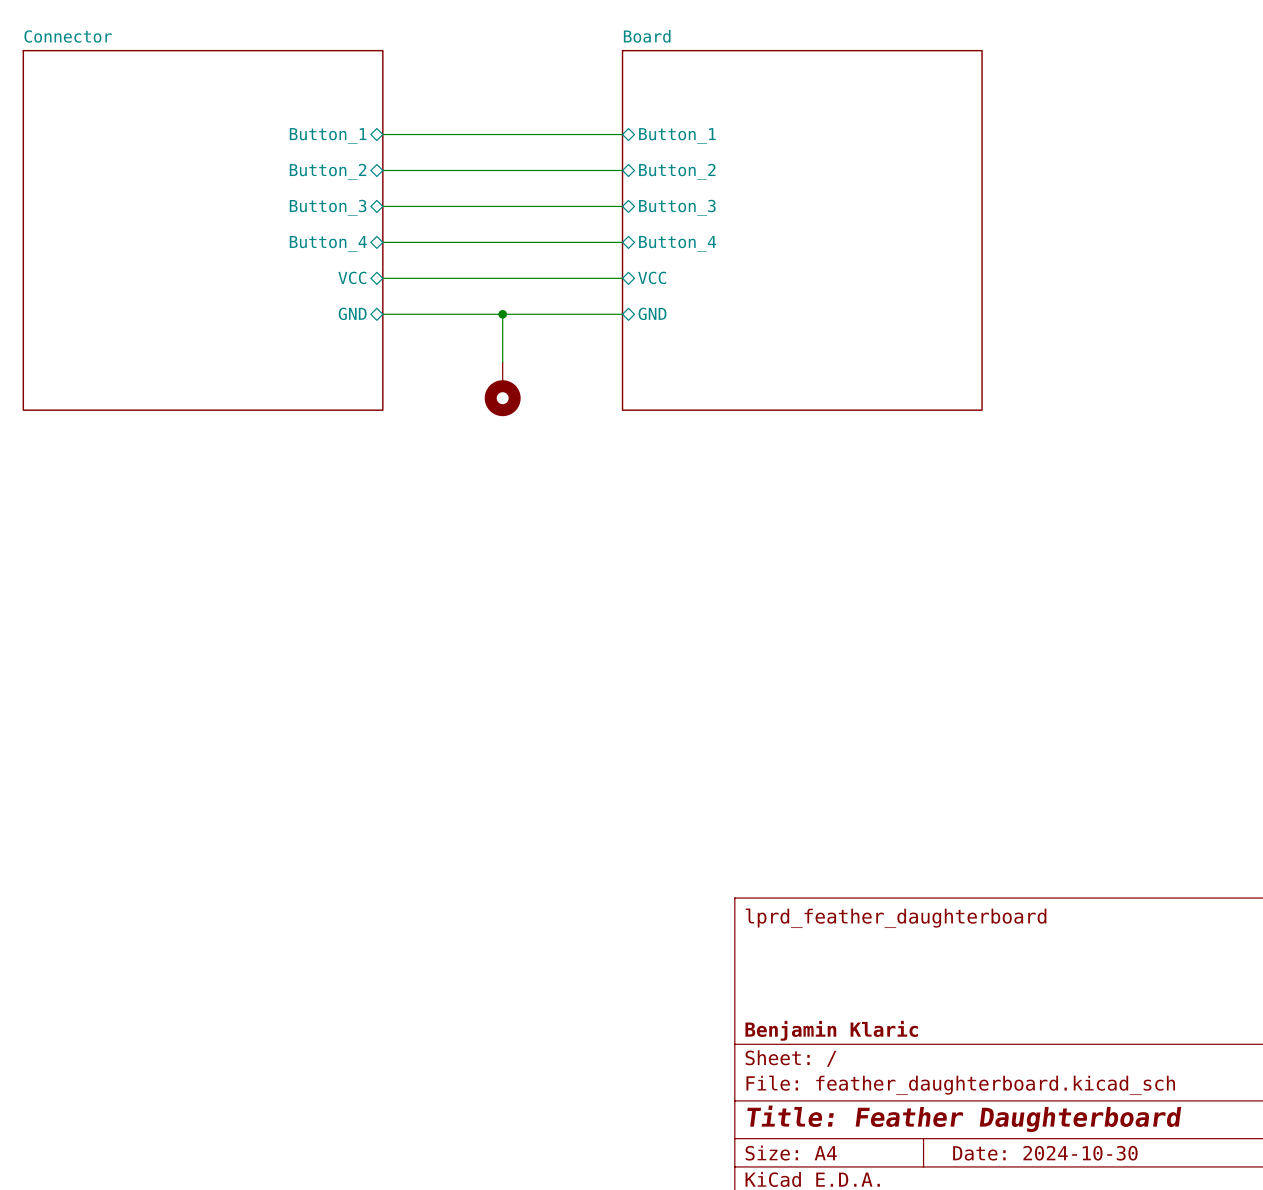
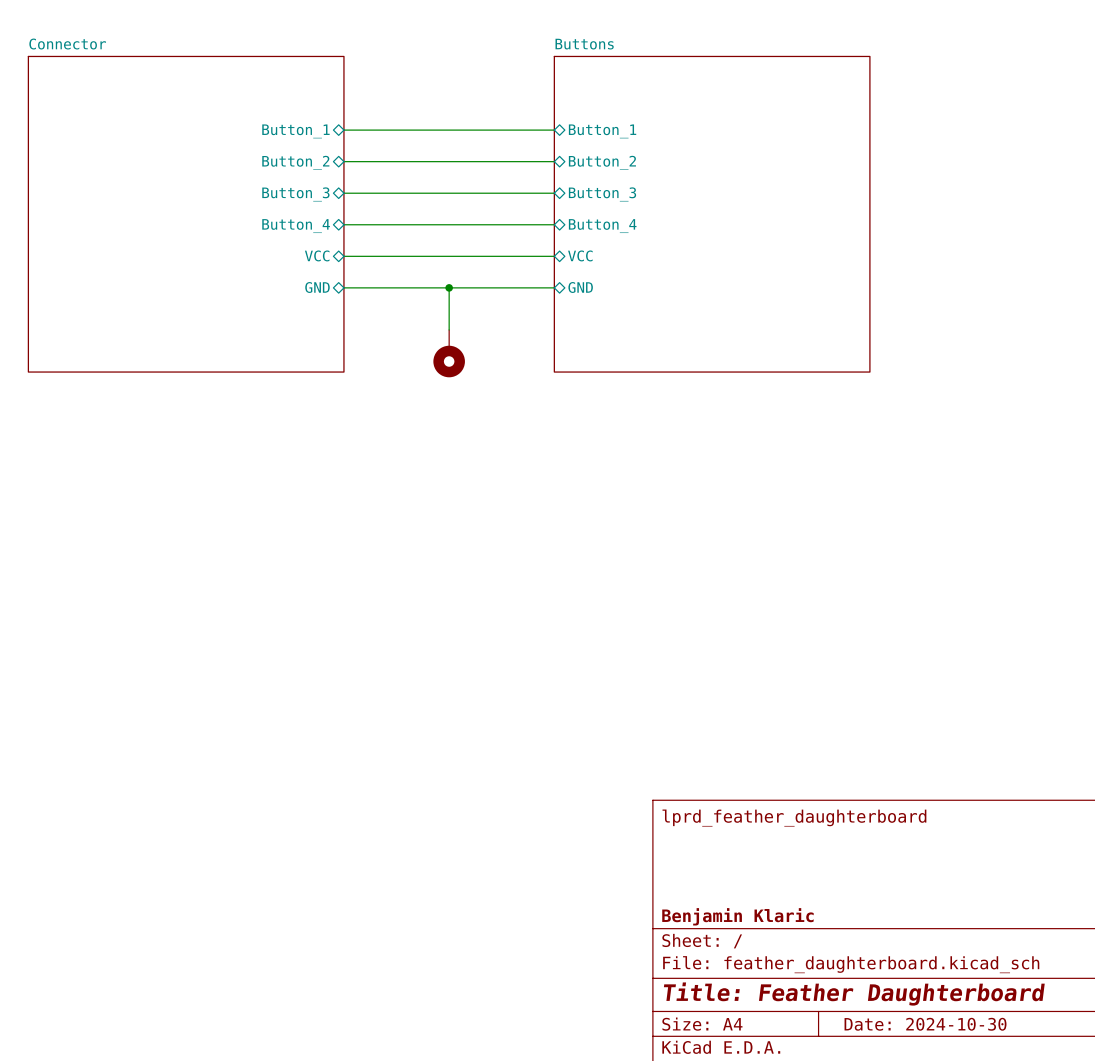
sheet Board name: Board (647, 36) -> Buttons (584, 44)

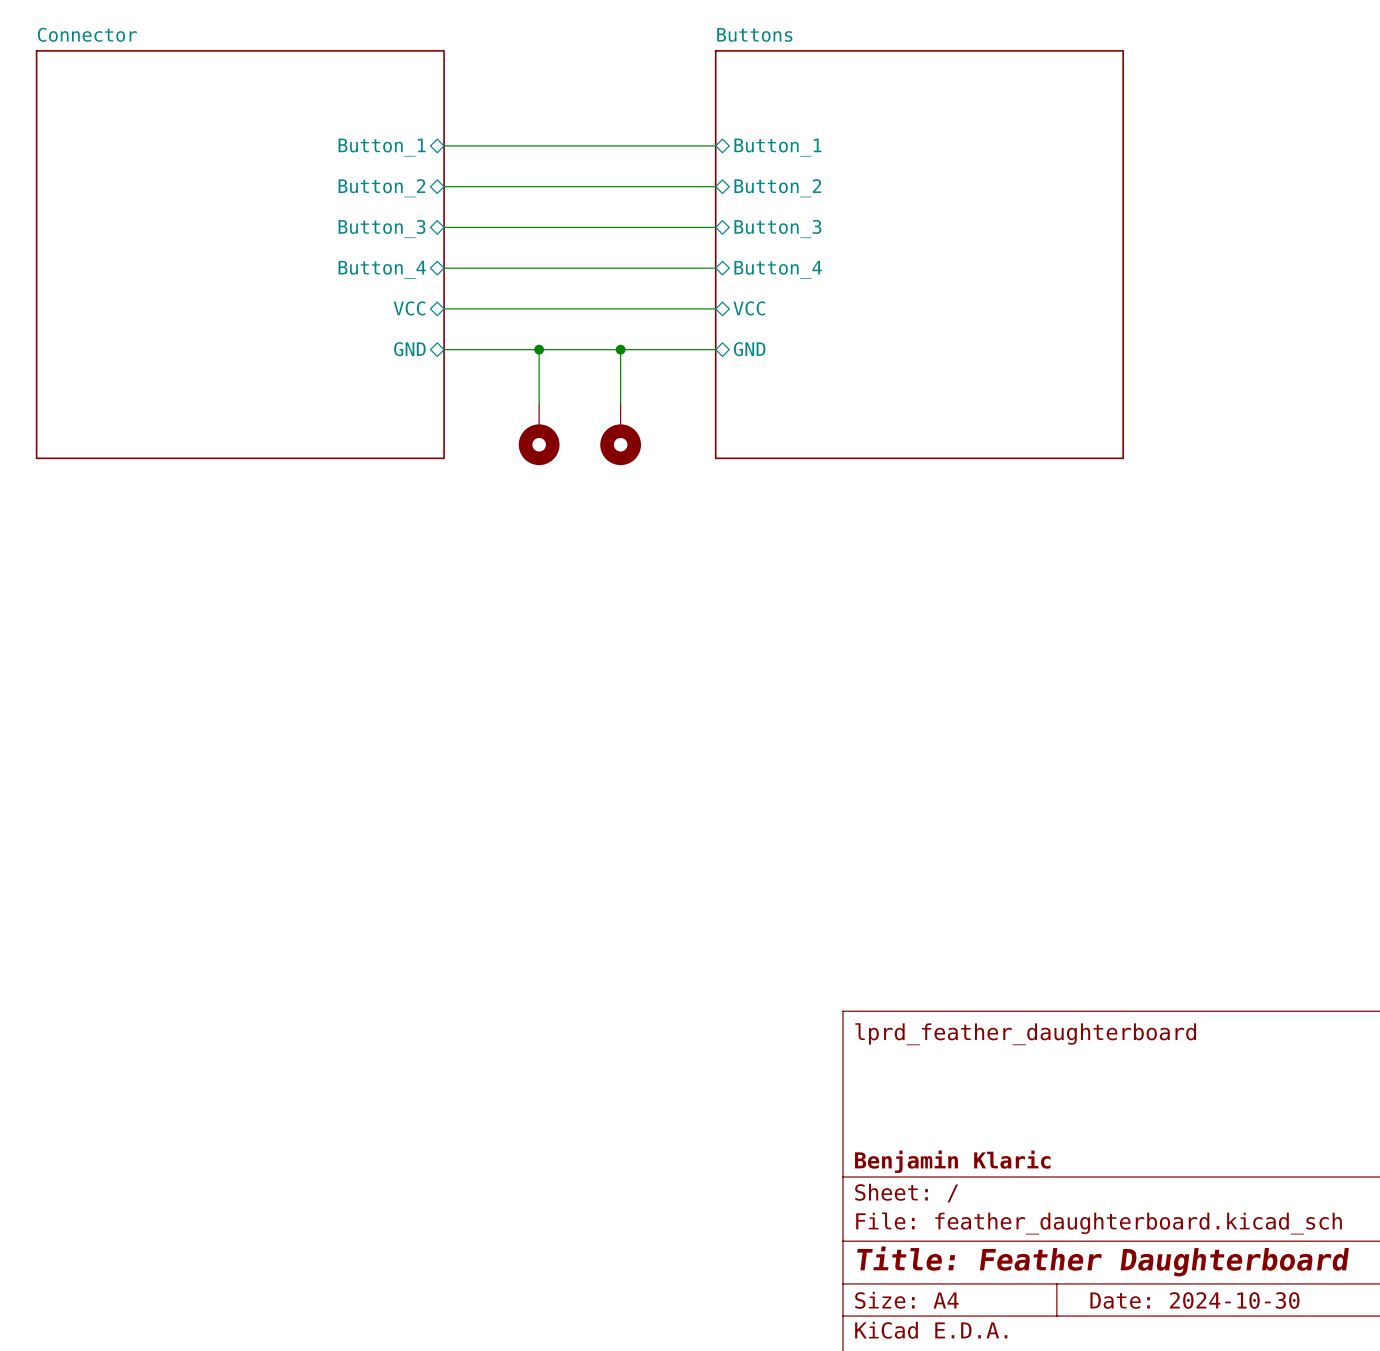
junction: none -> (539, 349)
wire: (449, 287) (449, 329) -> (539, 349) (539, 403)
junction: (449, 287) -> none
wire: none -> (620, 349) (620, 403)
junction: none -> (620, 349)
part: none -> (539, 434)
part: (449, 353) -> none
part: none -> (620, 434)

